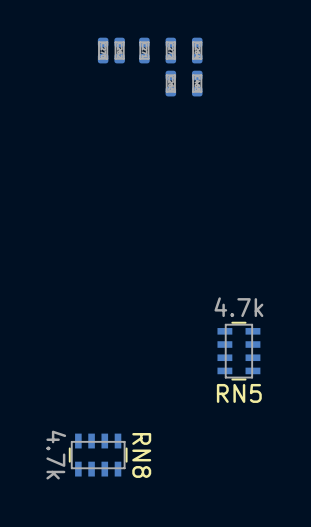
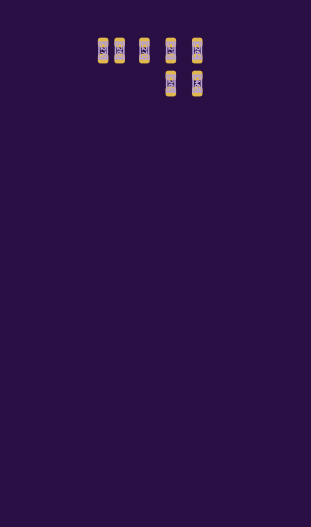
RN5: 4.7k (238, 351) -> none
RN8: 4.7k (98, 455) -> none

